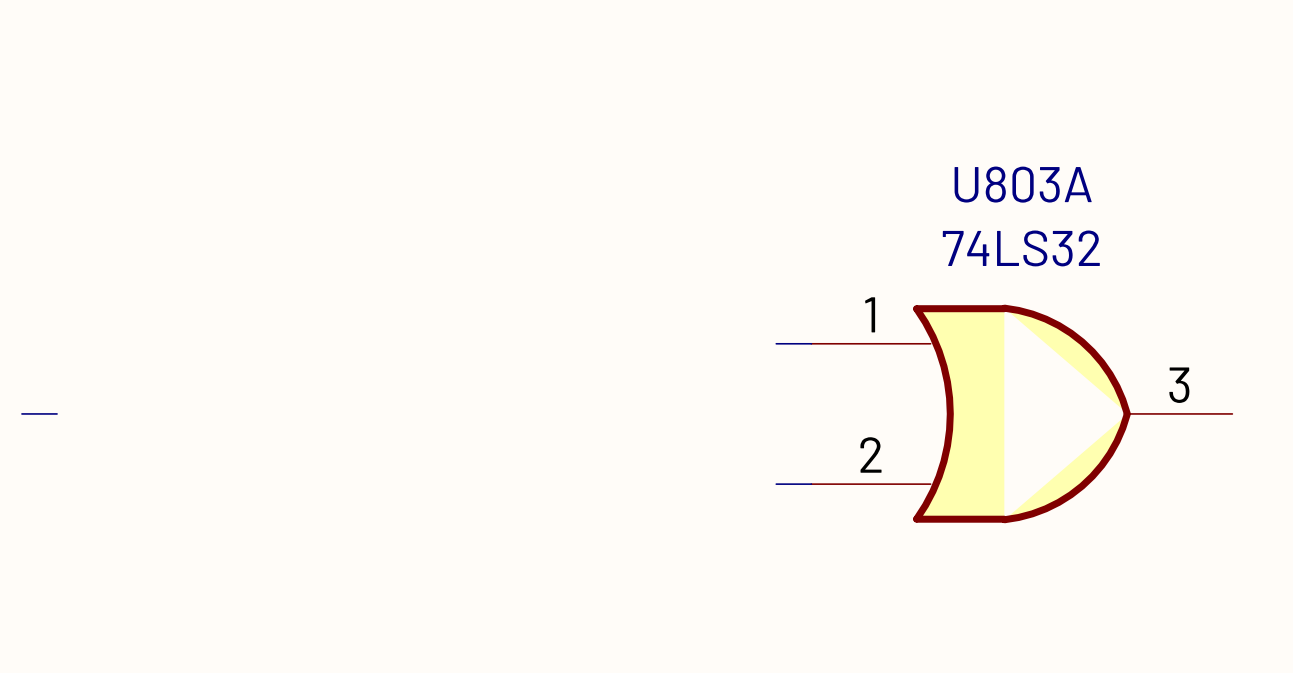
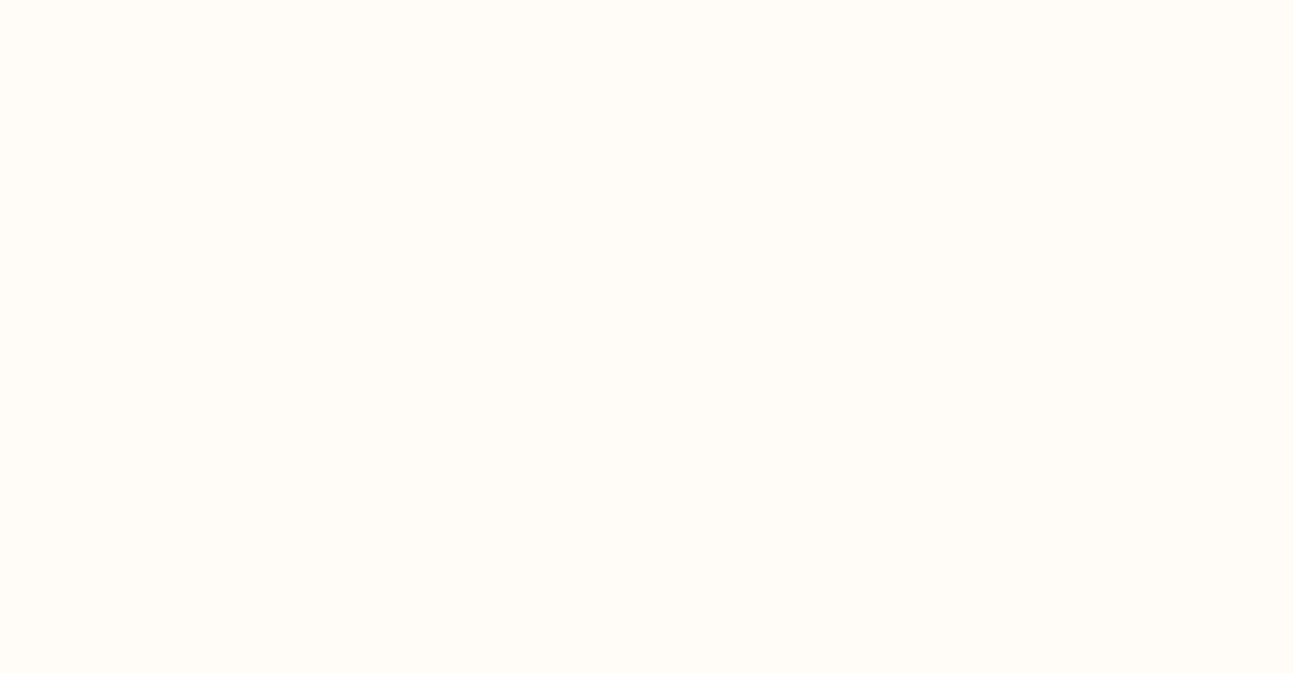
wire: (776, 343) (811, 343) -> none
wire: (21, 413) (57, 413) -> none
U803A: 74LS32 (1021, 413) -> none
wire: (776, 484) (811, 484) -> none

